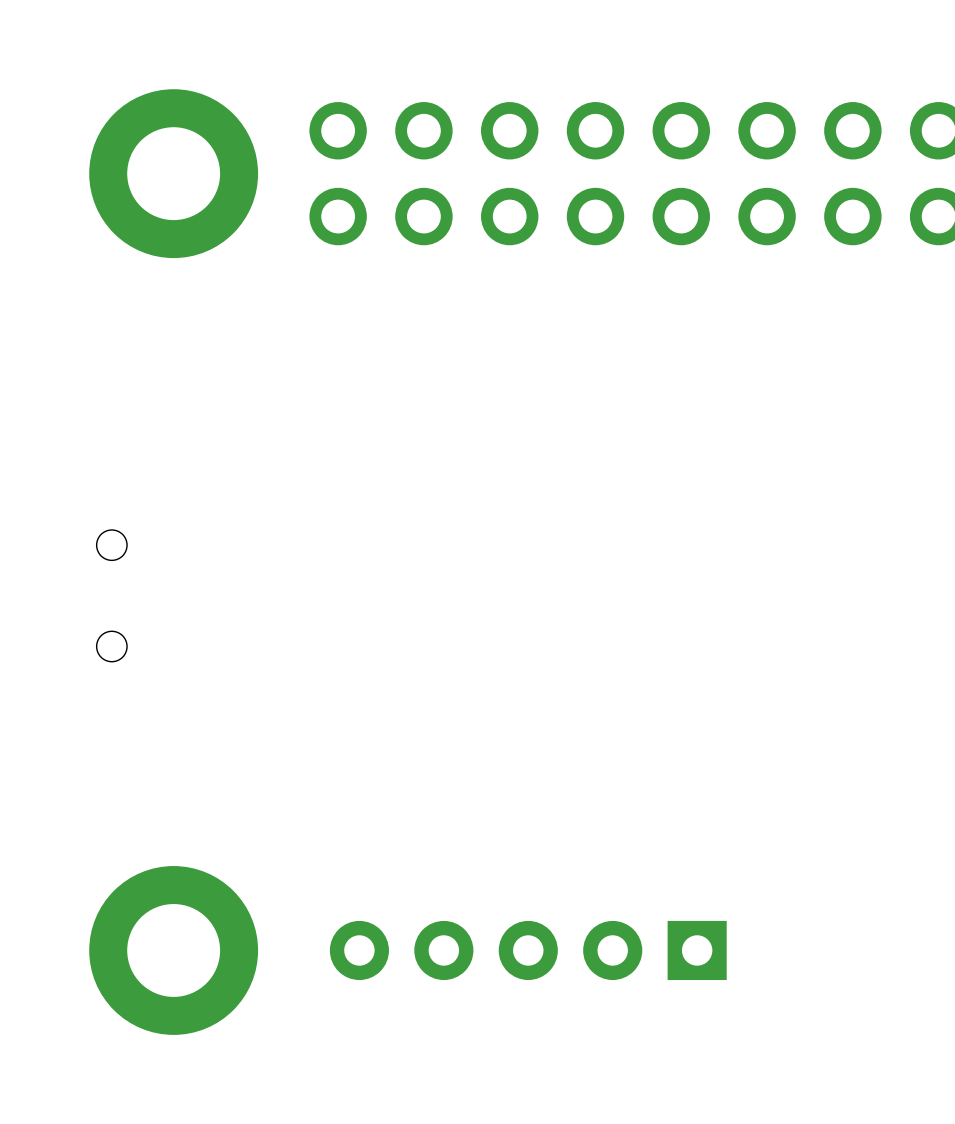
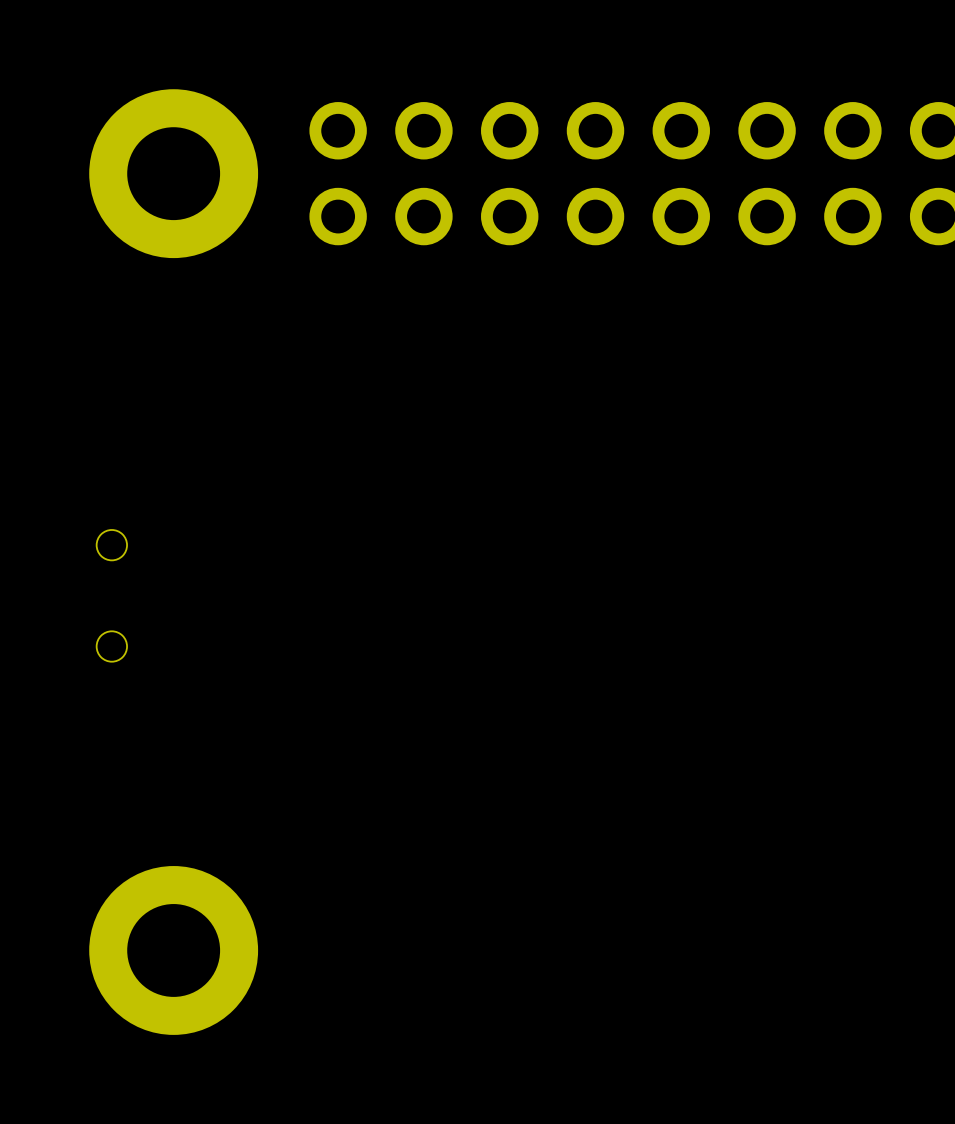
part: (528, 950) -> none

